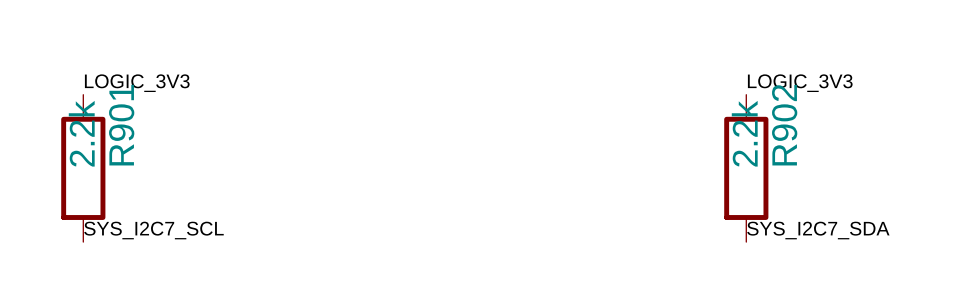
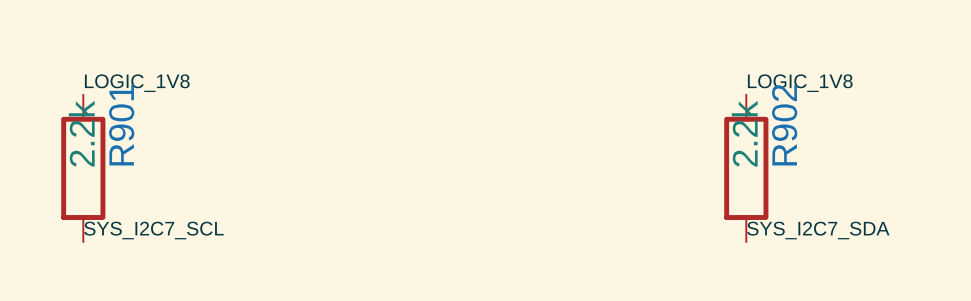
label: LOGIC_3V3 (137, 83) -> LOGIC_1V8 (137, 83)
label: LOGIC_3V3 (800, 83) -> LOGIC_1V8 (800, 83)

